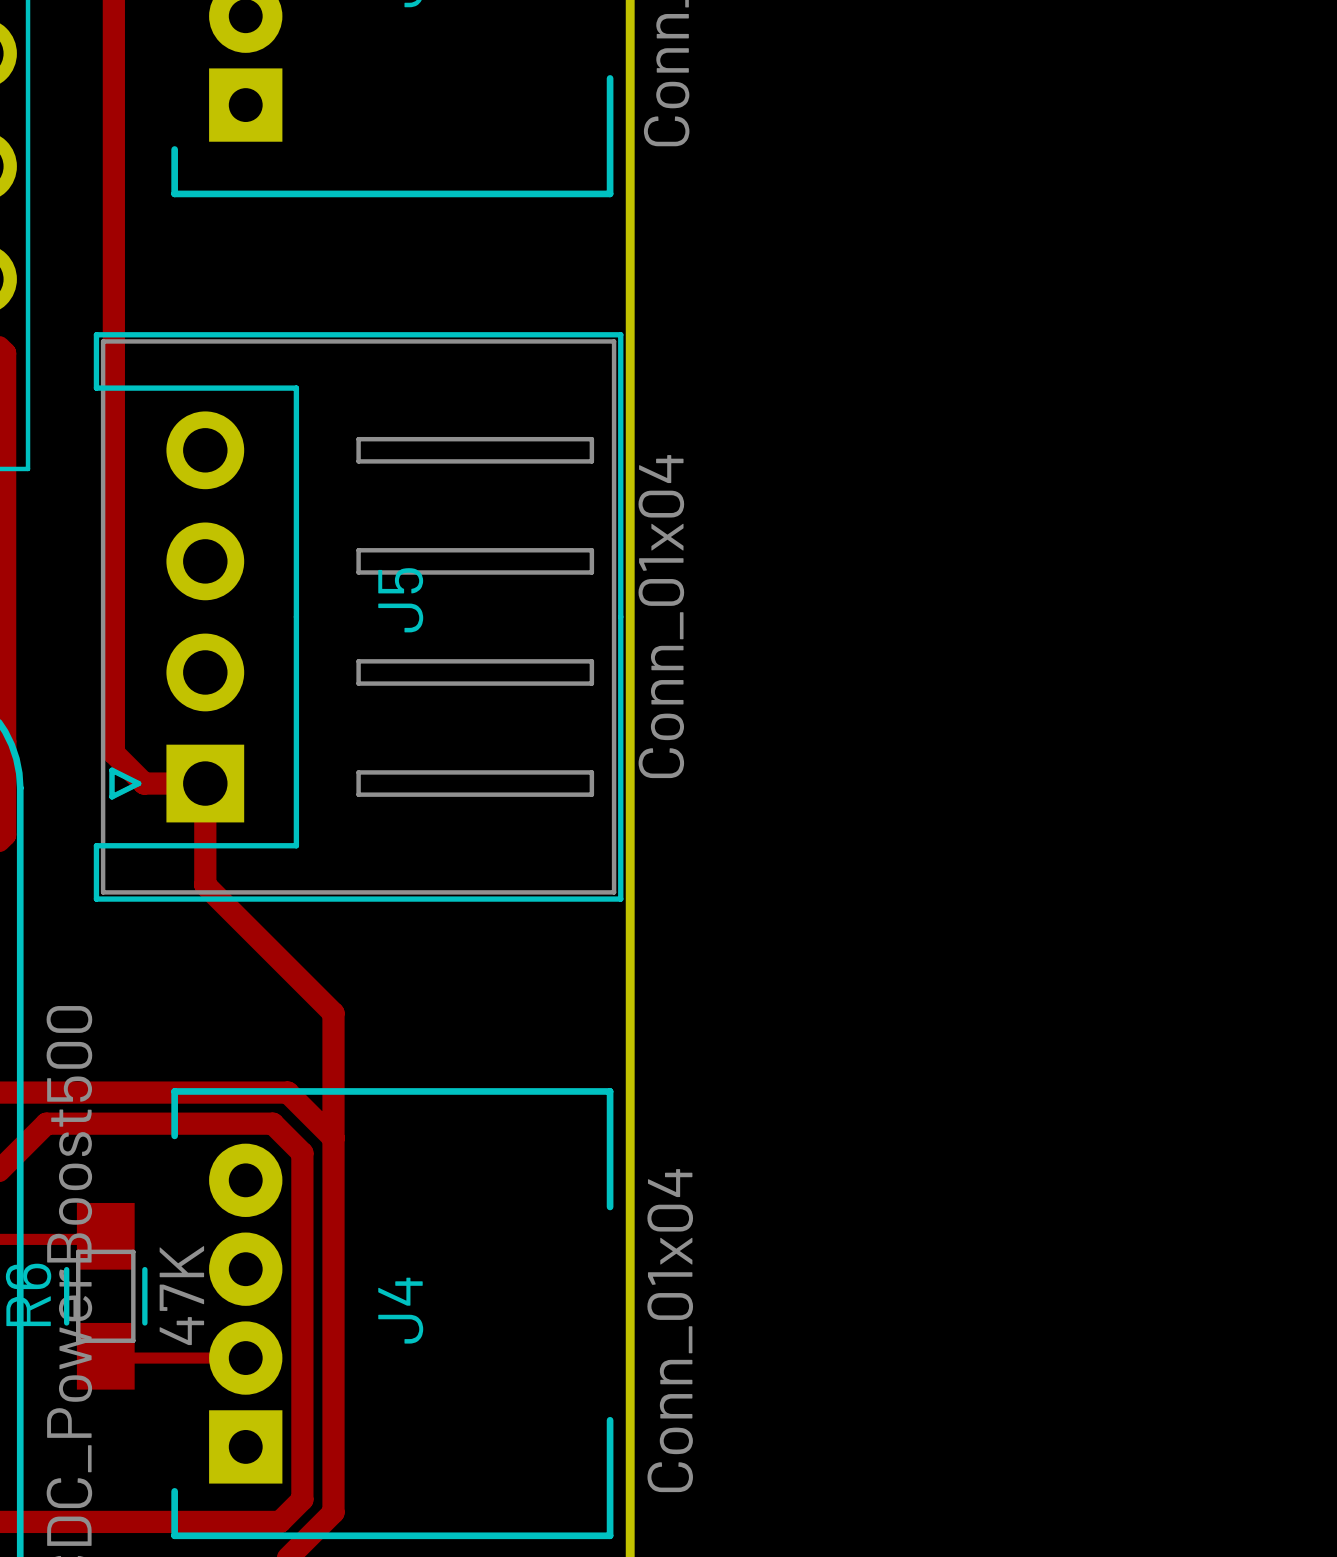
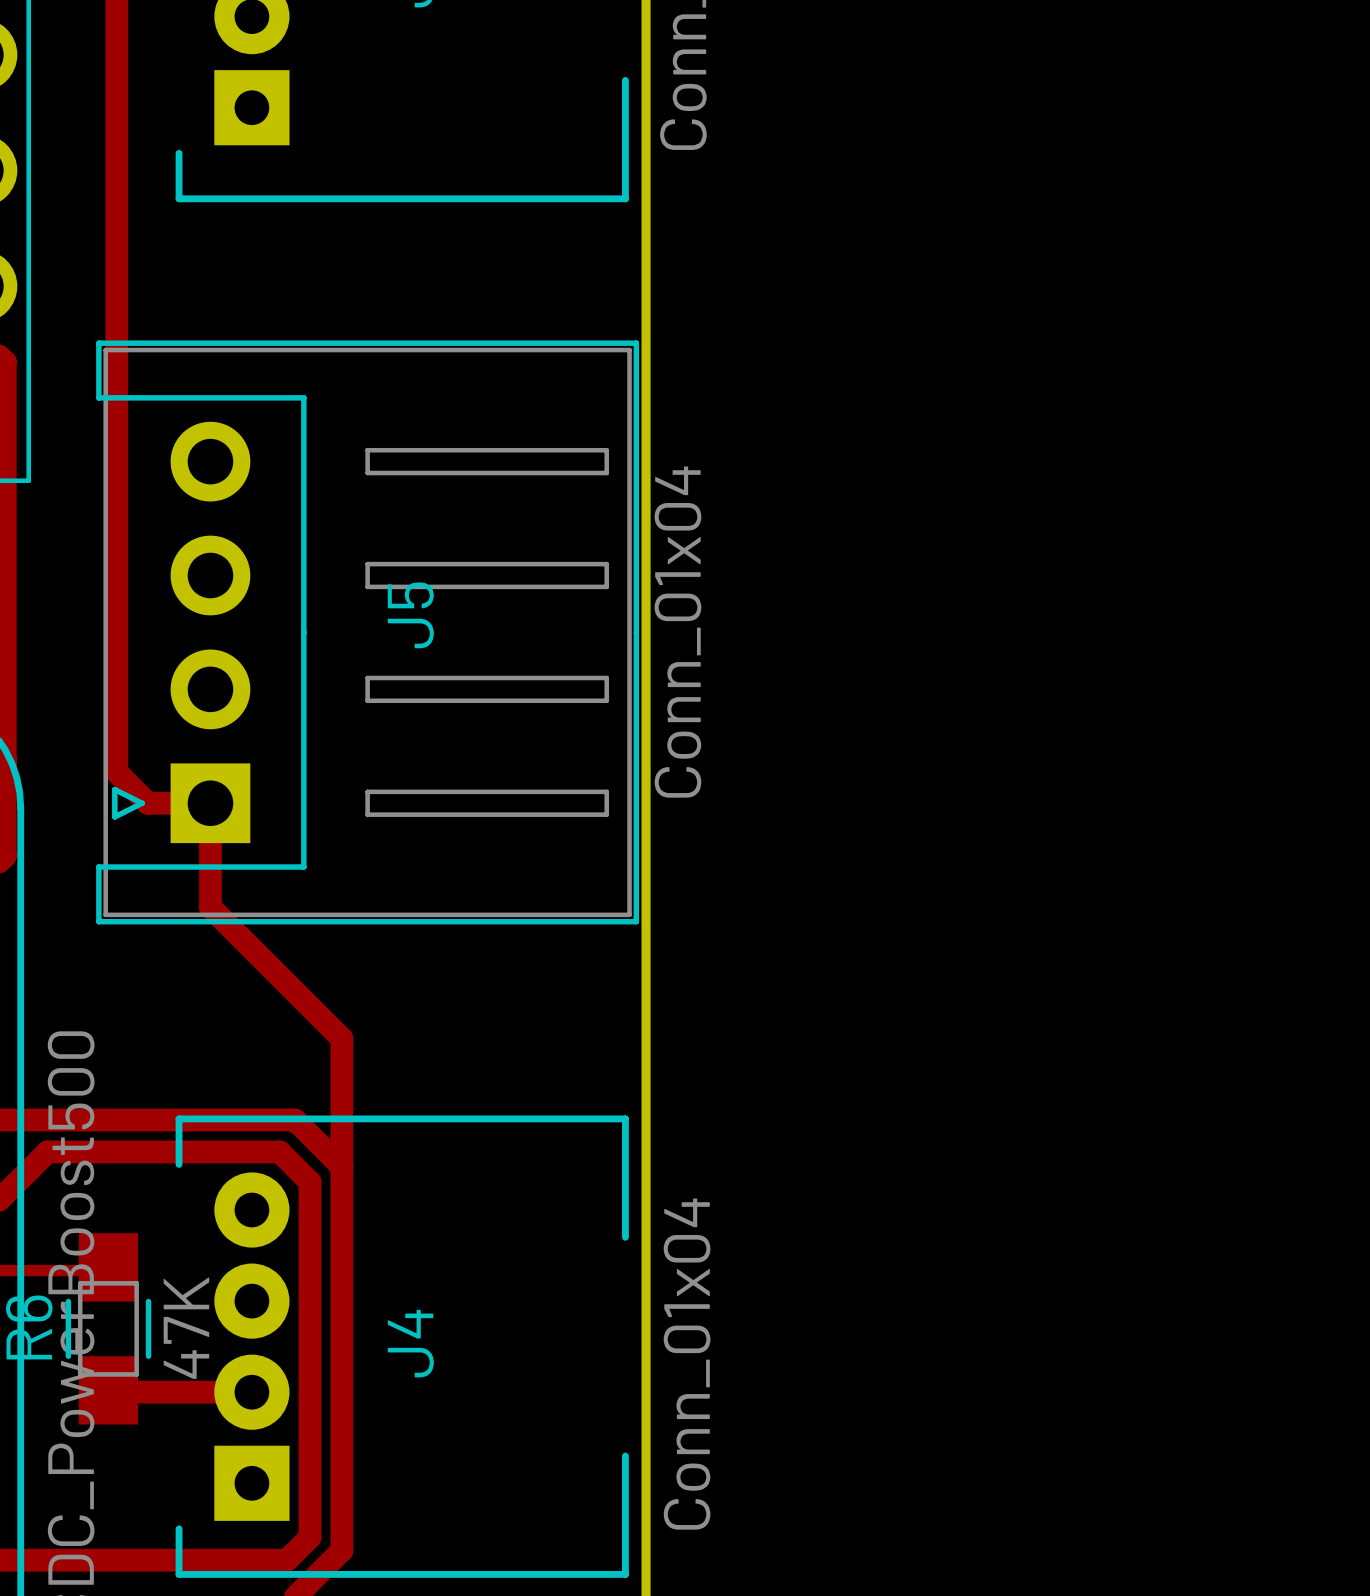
track width: thin (107, 1358) (245, 1358) -> thick (110, 1392) (251, 1392)

